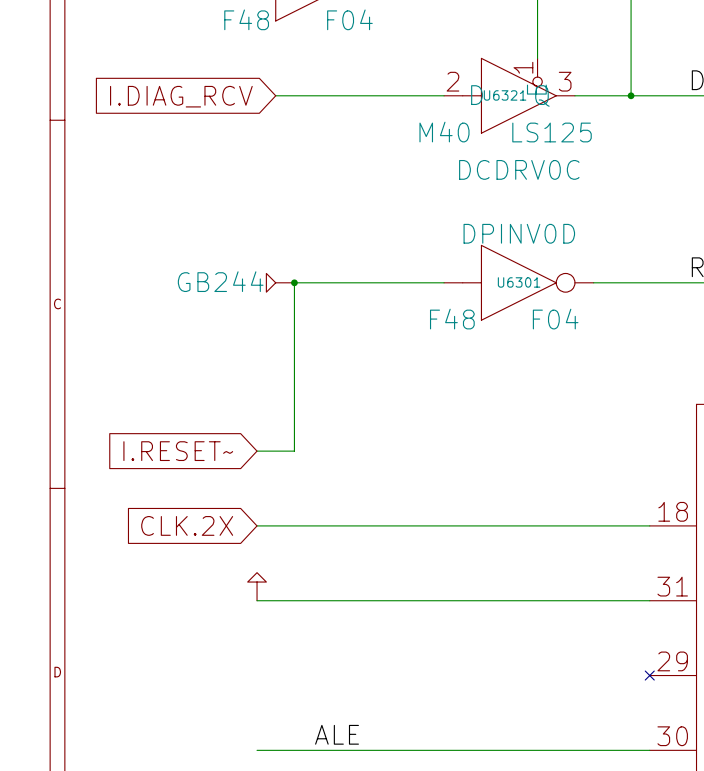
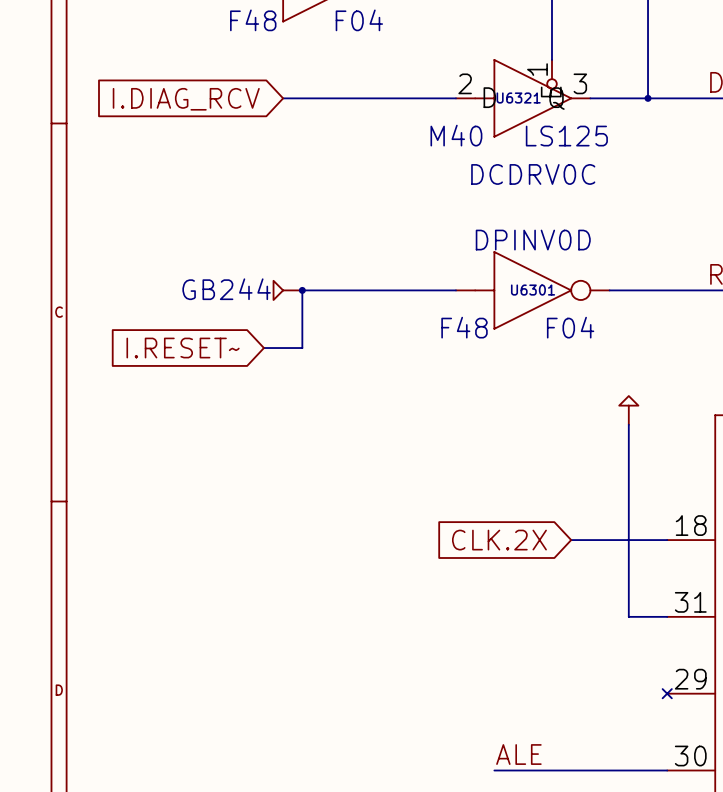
wire: (294, 338) (294, 451) (257, 451) -> (302, 348) (263, 348)
power symbol: none -> (628, 410)
global label position: I.RESET~ (178, 451) -> I.RESET~ (183, 348)
global label: CLK.2X (187, 525) -> none
wire: (257, 525) (556, 525) -> none
global label: none -> CLK.2X (499, 540)
power symbol: (257, 586) -> none
wire: (257, 600) (612, 600) -> (628, 424) (628, 616)
label position: ALE (337, 734) -> ALE (518, 754)
wire: (257, 750) (481, 750) -> none

